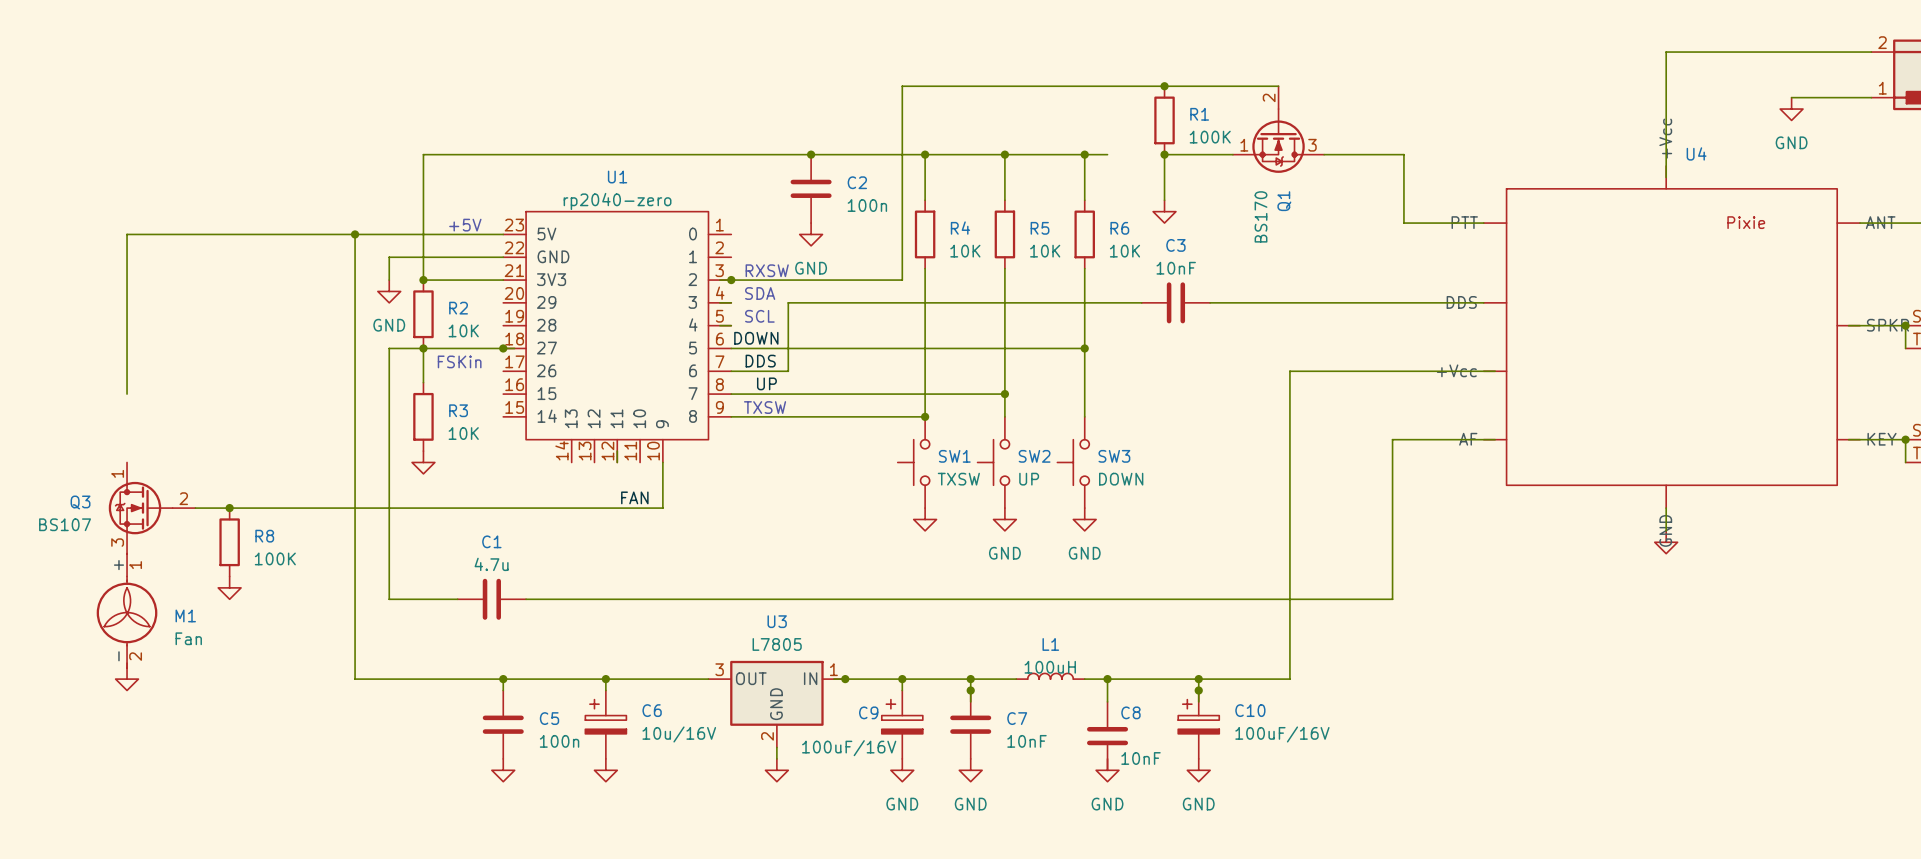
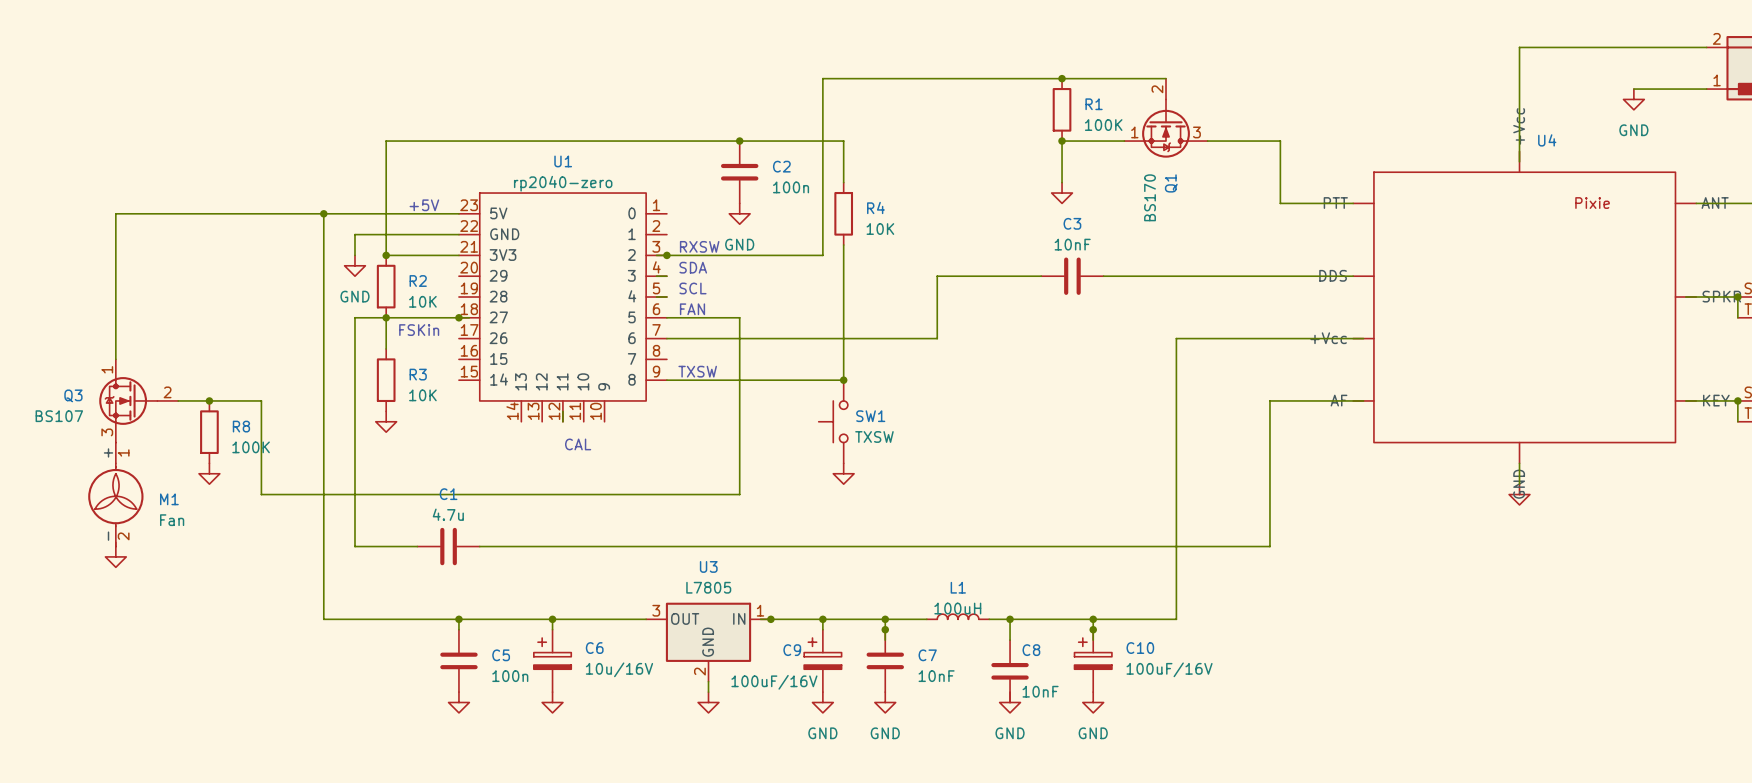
wire: (925, 154) (1107, 154) -> none
junction: (925, 154) -> none
wire: (1004, 154) (1004, 200) -> none
junction: (1004, 154) -> none
wire: (1084, 154) (1084, 200) -> none
junction: (1084, 154) -> none
R5: 10K (1004, 234) -> none
R6: 10K (1084, 234) -> none
wire: (1004, 268) (1004, 416) -> none
wire: (1084, 268) (1084, 416) -> none
wire: (1027, 302) (788, 302) (788, 371) -> (937, 276) (937, 338) (718, 338)
label: DOWN (756, 338) -> none
text: none -> FAN (692, 309)
wire: (811, 348) (1084, 348) -> (739, 317) (739, 494) (261, 494) (261, 400) (178, 400)
junction: (1084, 348) -> none
label: DDS (760, 361) -> none
label: UP (766, 383) -> none
wire: (731, 394) (1004, 394) -> none
junction: (1004, 394) -> none
junction: none -> (209, 400)
wire: (662, 462) (662, 508) (195, 508) -> none
SW2: UP (993, 462) -> none
SW3: DOWN (1073, 462) -> none
text: none -> CAL (578, 444)
label: FAN (634, 497) -> none
Q3 position: (152, 508) -> (138, 400)
junction: (229, 508) -> none
power symbol: none -> (209, 473)
power symbol: GND (1004, 519) -> none
power symbol: GND (1084, 519) -> none
R8 position: (229, 542) -> (209, 432)
power symbol: (229, 587) -> none
M1 position: (127, 610) -> (115, 494)
power symbol: none -> (115, 556)
power symbol: (127, 679) -> none

